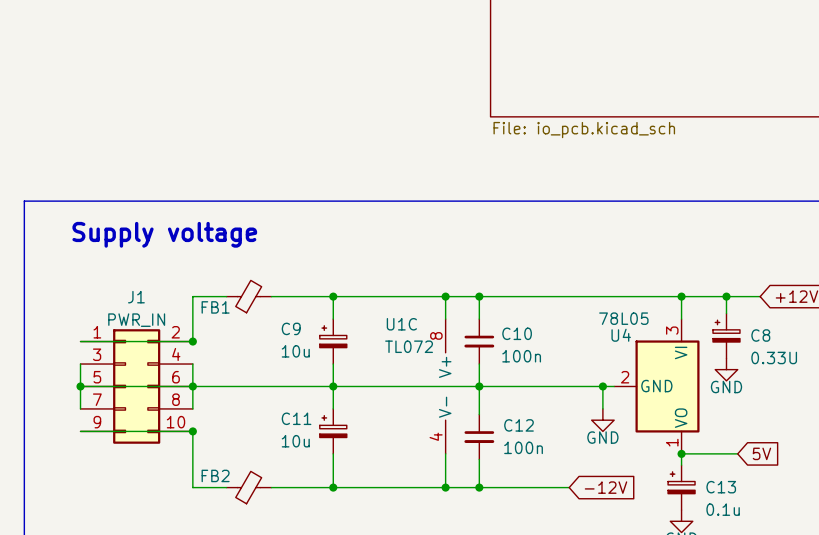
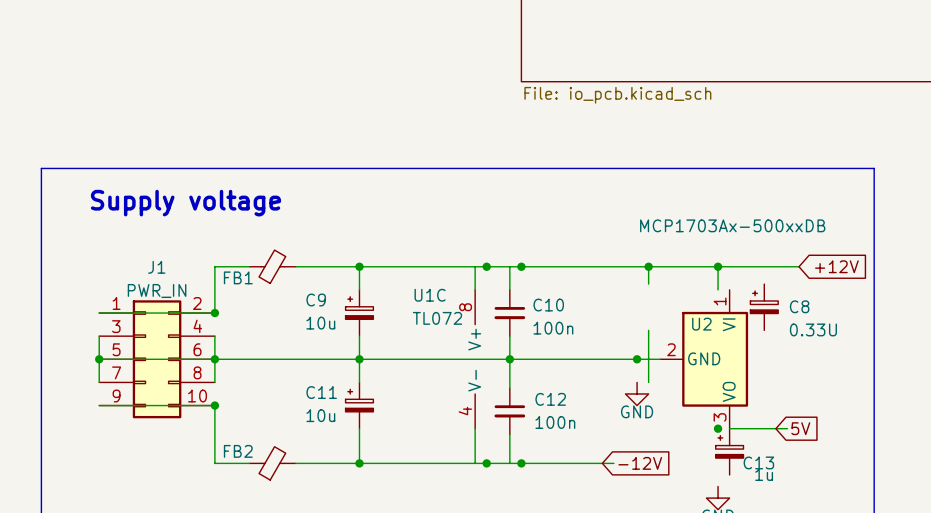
junction: (445, 296) -> none
junction: none -> (486, 266)
junction: (479, 296) -> none
junction: none -> (521, 266)
junction: none -> (648, 266)
wire: (726, 296) (726, 313) -> (648, 266) (648, 284)
junction: (726, 296) -> none
wire: none -> (648, 330) (648, 382)
power symbol: GND (726, 369) -> none
wire: (602, 386) (602, 408) -> none
U4: 78L05 (656, 386) -> none
U2: none -> MCP1703Ax-500xxDB (704, 359)
wire: (692, 453) (681, 453) (681, 465) -> none
wire: none -> (775, 428) (787, 428)
junction: (445, 487) -> none
junction: none -> (486, 463)
junction: (479, 487) -> none
junction: none -> (521, 463)
wire: none -> (602, 463) (613, 463)
C13 position: (681, 487) -> (729, 451)
C13 value: 0.1u (723, 509) -> 1u (764, 474)

